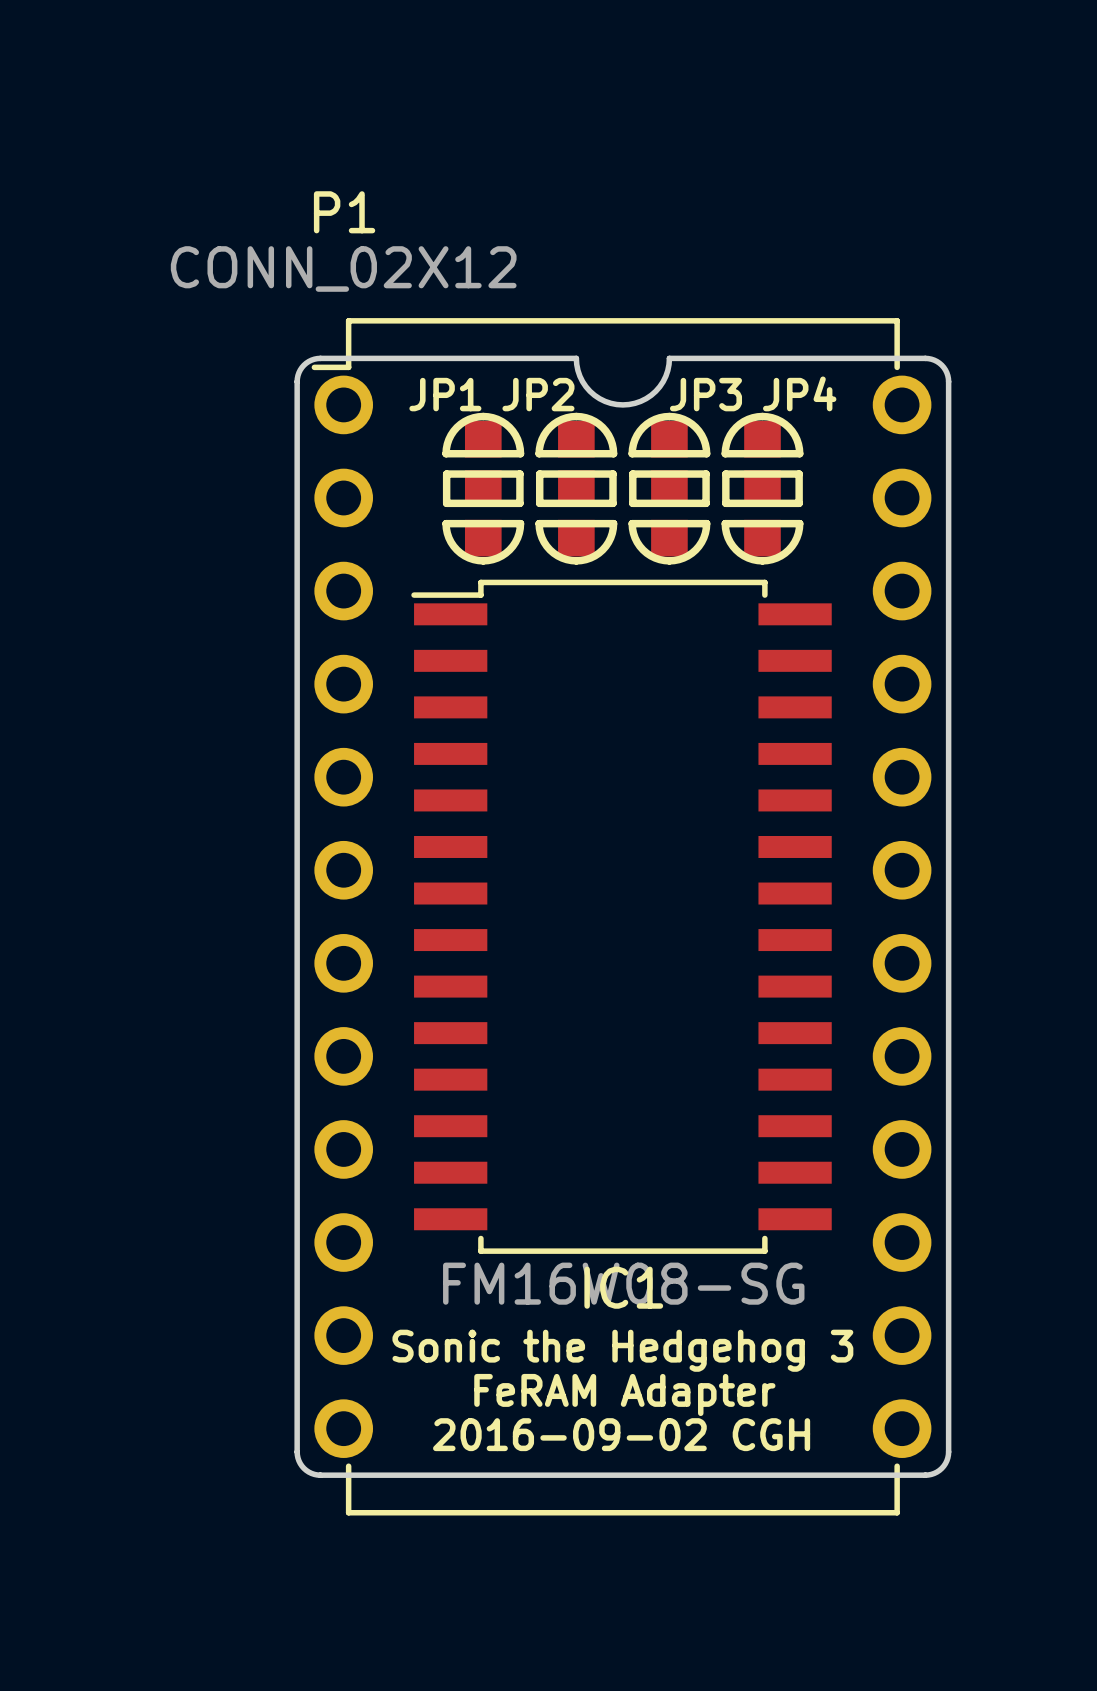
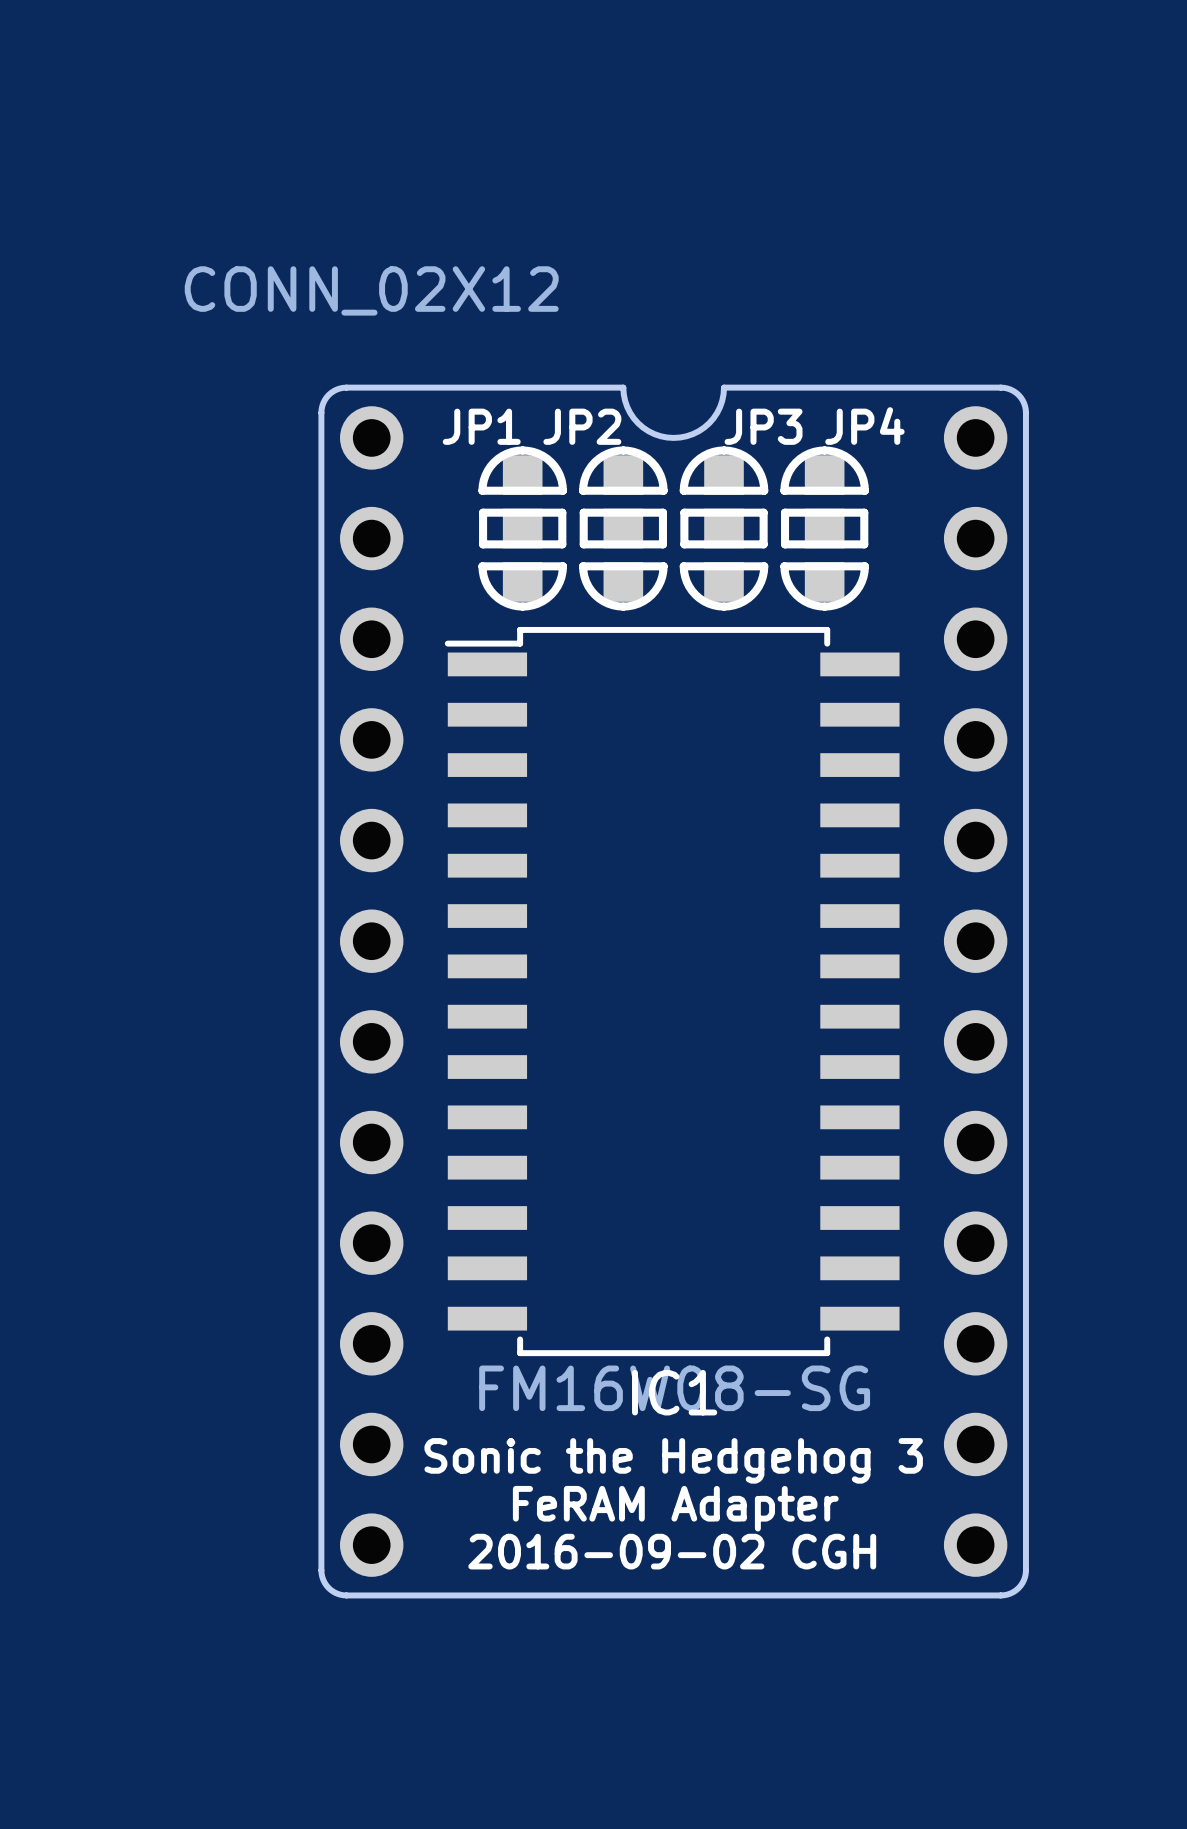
P1: CONN_02X12 (621, 916) -> none

